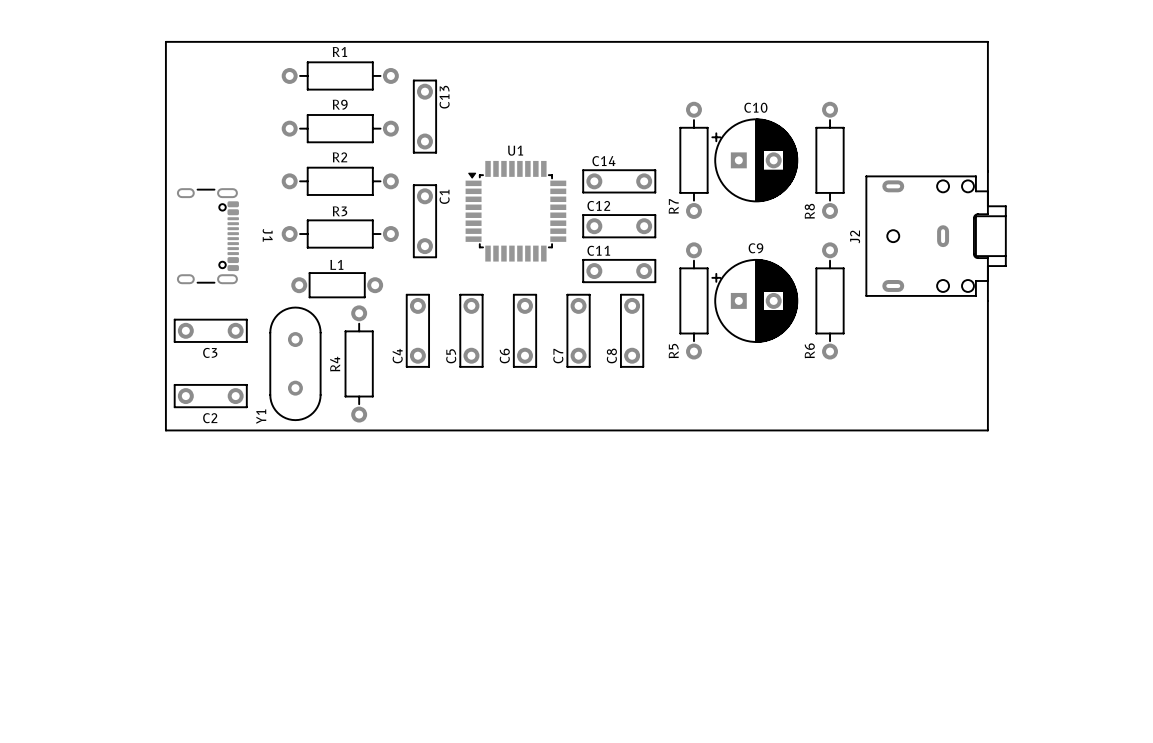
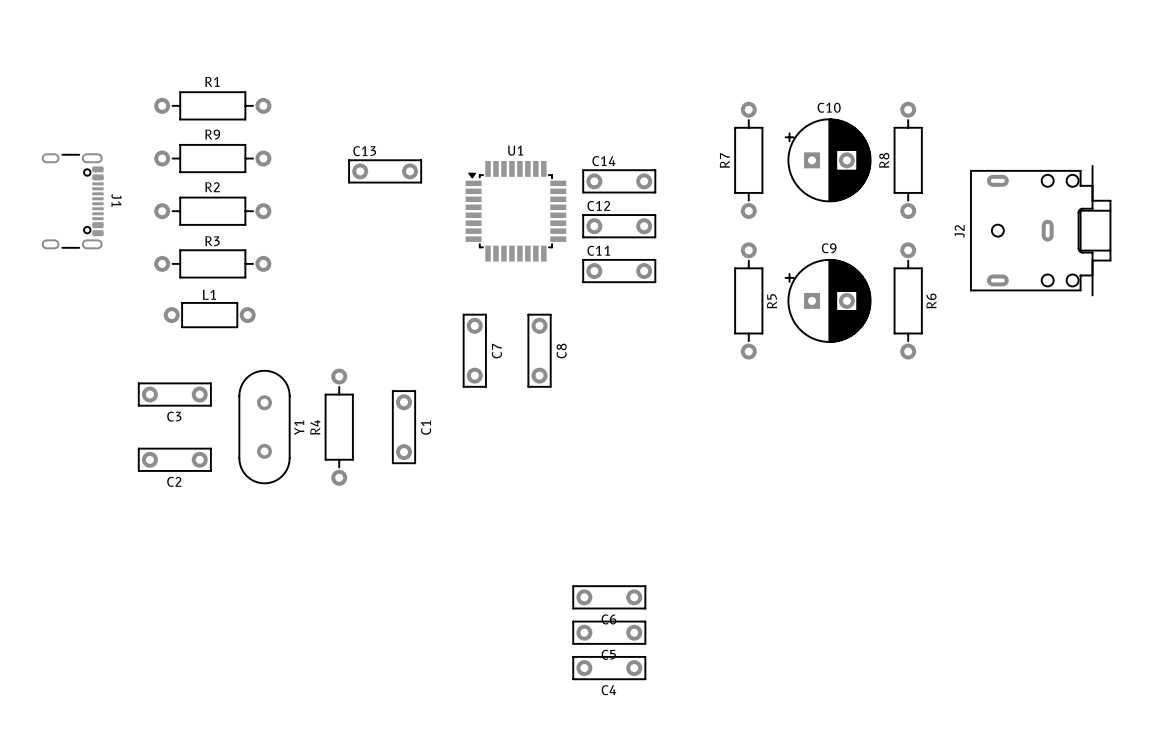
R1 position: (340, 75) -> (212, 105)
C13 name position: C13 (444, 97) -> C13 (364, 151)
C13 rotation: 0° (424, 116) -> 90° clockwise (385, 171)
C13 position: (424, 116) -> (385, 171)
R9 position: (340, 128) -> (212, 158)
R7 position: (693, 160) -> (748, 160)
C10 position: (754, 160) -> (828, 160)
R8 position: (830, 160) -> (908, 160)
board edge: (987, 171) (987, 41) (165, 41) (165, 430) (987, 430) (987, 300) -> none
R2 position: (340, 181) -> (212, 211)
C1 name position: C1 (444, 196) -> C1 (426, 427)
R7 name position: R7 (673, 206) -> R7 (724, 160)
R8 name position: R8 (809, 211) -> R8 (884, 160)
C1 position: (424, 221) -> (404, 427)
R3 position: (340, 234) -> (212, 263)
J1 name position: J1 (267, 235) -> J1 (116, 200)
J1 position: (207, 236) -> (72, 201)
J2 position: (936, 236) -> (1040, 230)
L1 position: (337, 285) -> (209, 315)
R5 position: (693, 300) -> (748, 300)
C9 position: (754, 300) -> (828, 300)
R6 position: (830, 300) -> (908, 300)
C3 position: (210, 330) -> (174, 394)
C4 rotation: 0° (417, 330) -> 90° clockwise (609, 668)
C4 position: (417, 330) -> (609, 668)
C5 rotation: 0° (471, 330) -> 90° clockwise (609, 632)
C5 position: (471, 330) -> (609, 632)
C6 rotation: 0° (525, 330) -> 90° clockwise (609, 597)
C6 position: (525, 330) -> (609, 597)
C7 position: (578, 330) -> (474, 350)
C8 position: (632, 330) -> (539, 350)
R6 name position: R6 (809, 350) -> R6 (931, 300)
R5 name position: R5 (673, 351) -> R5 (772, 301)
C8 name position: C8 (611, 355) -> C8 (561, 351)
C7 name position: C7 (558, 356) -> C7 (496, 351)
Y1 position: (295, 363) -> (264, 427)
R4 position: (359, 363) -> (339, 427)
C2 position: (210, 396) -> (174, 459)
Y1 name position: Y1 (261, 416) -> Y1 (299, 427)

